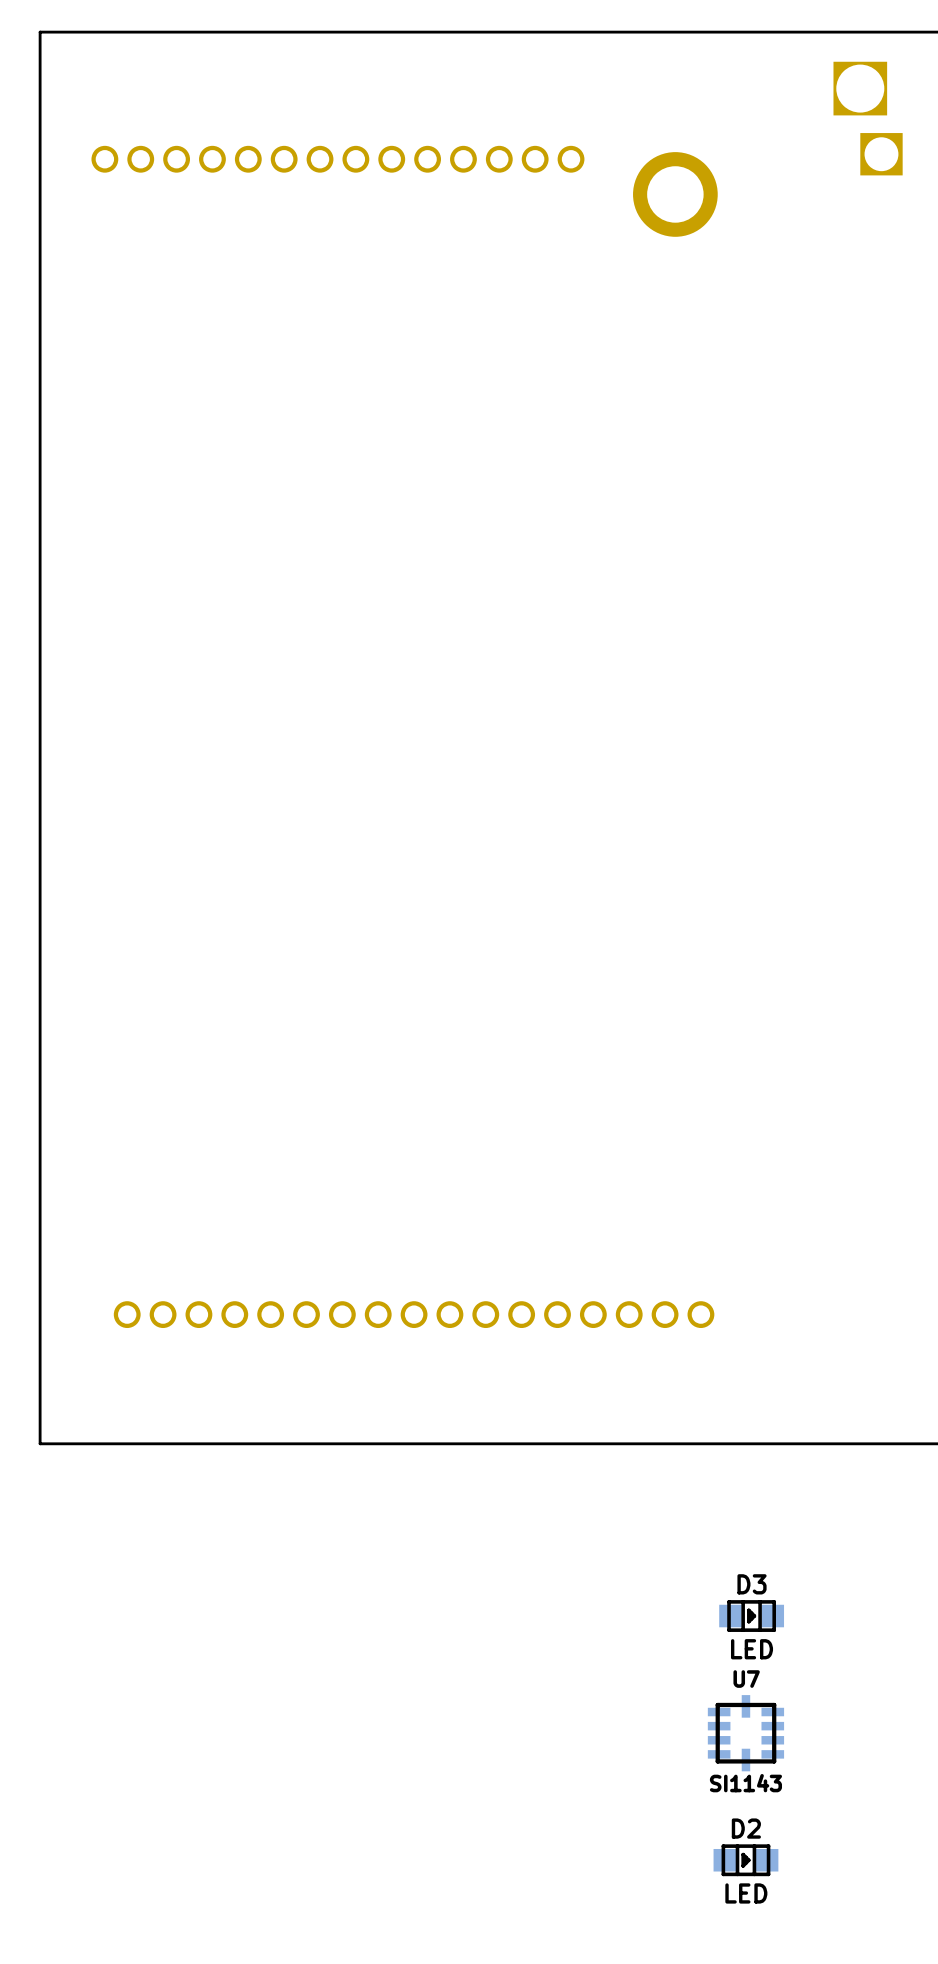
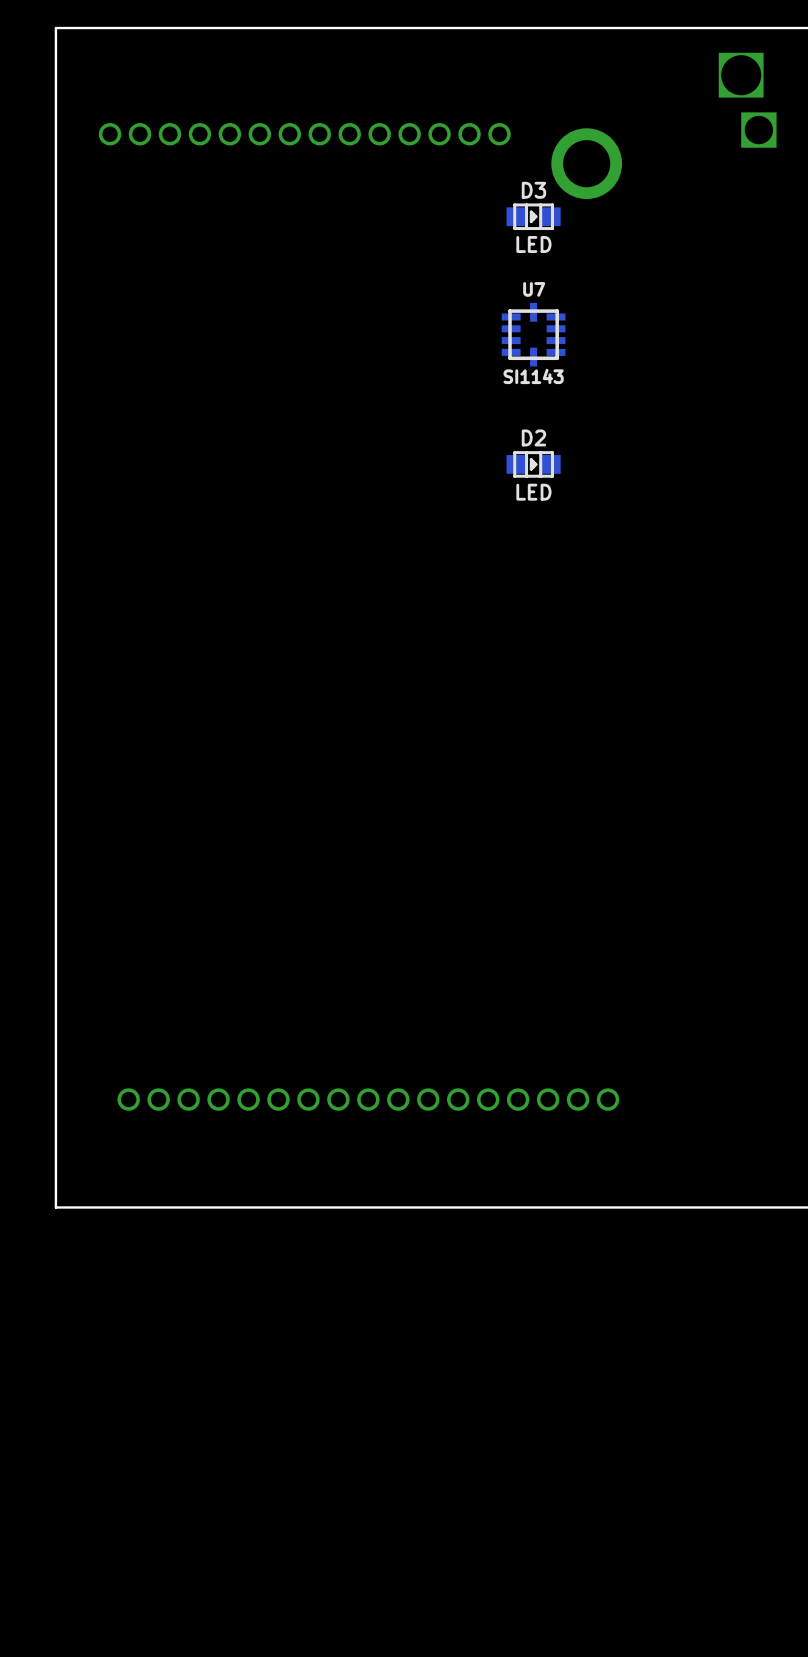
D3 position: (751, 1616) -> (533, 216)
U7 position: (745, 1733) -> (533, 334)
D2 position: (745, 1860) -> (533, 464)

